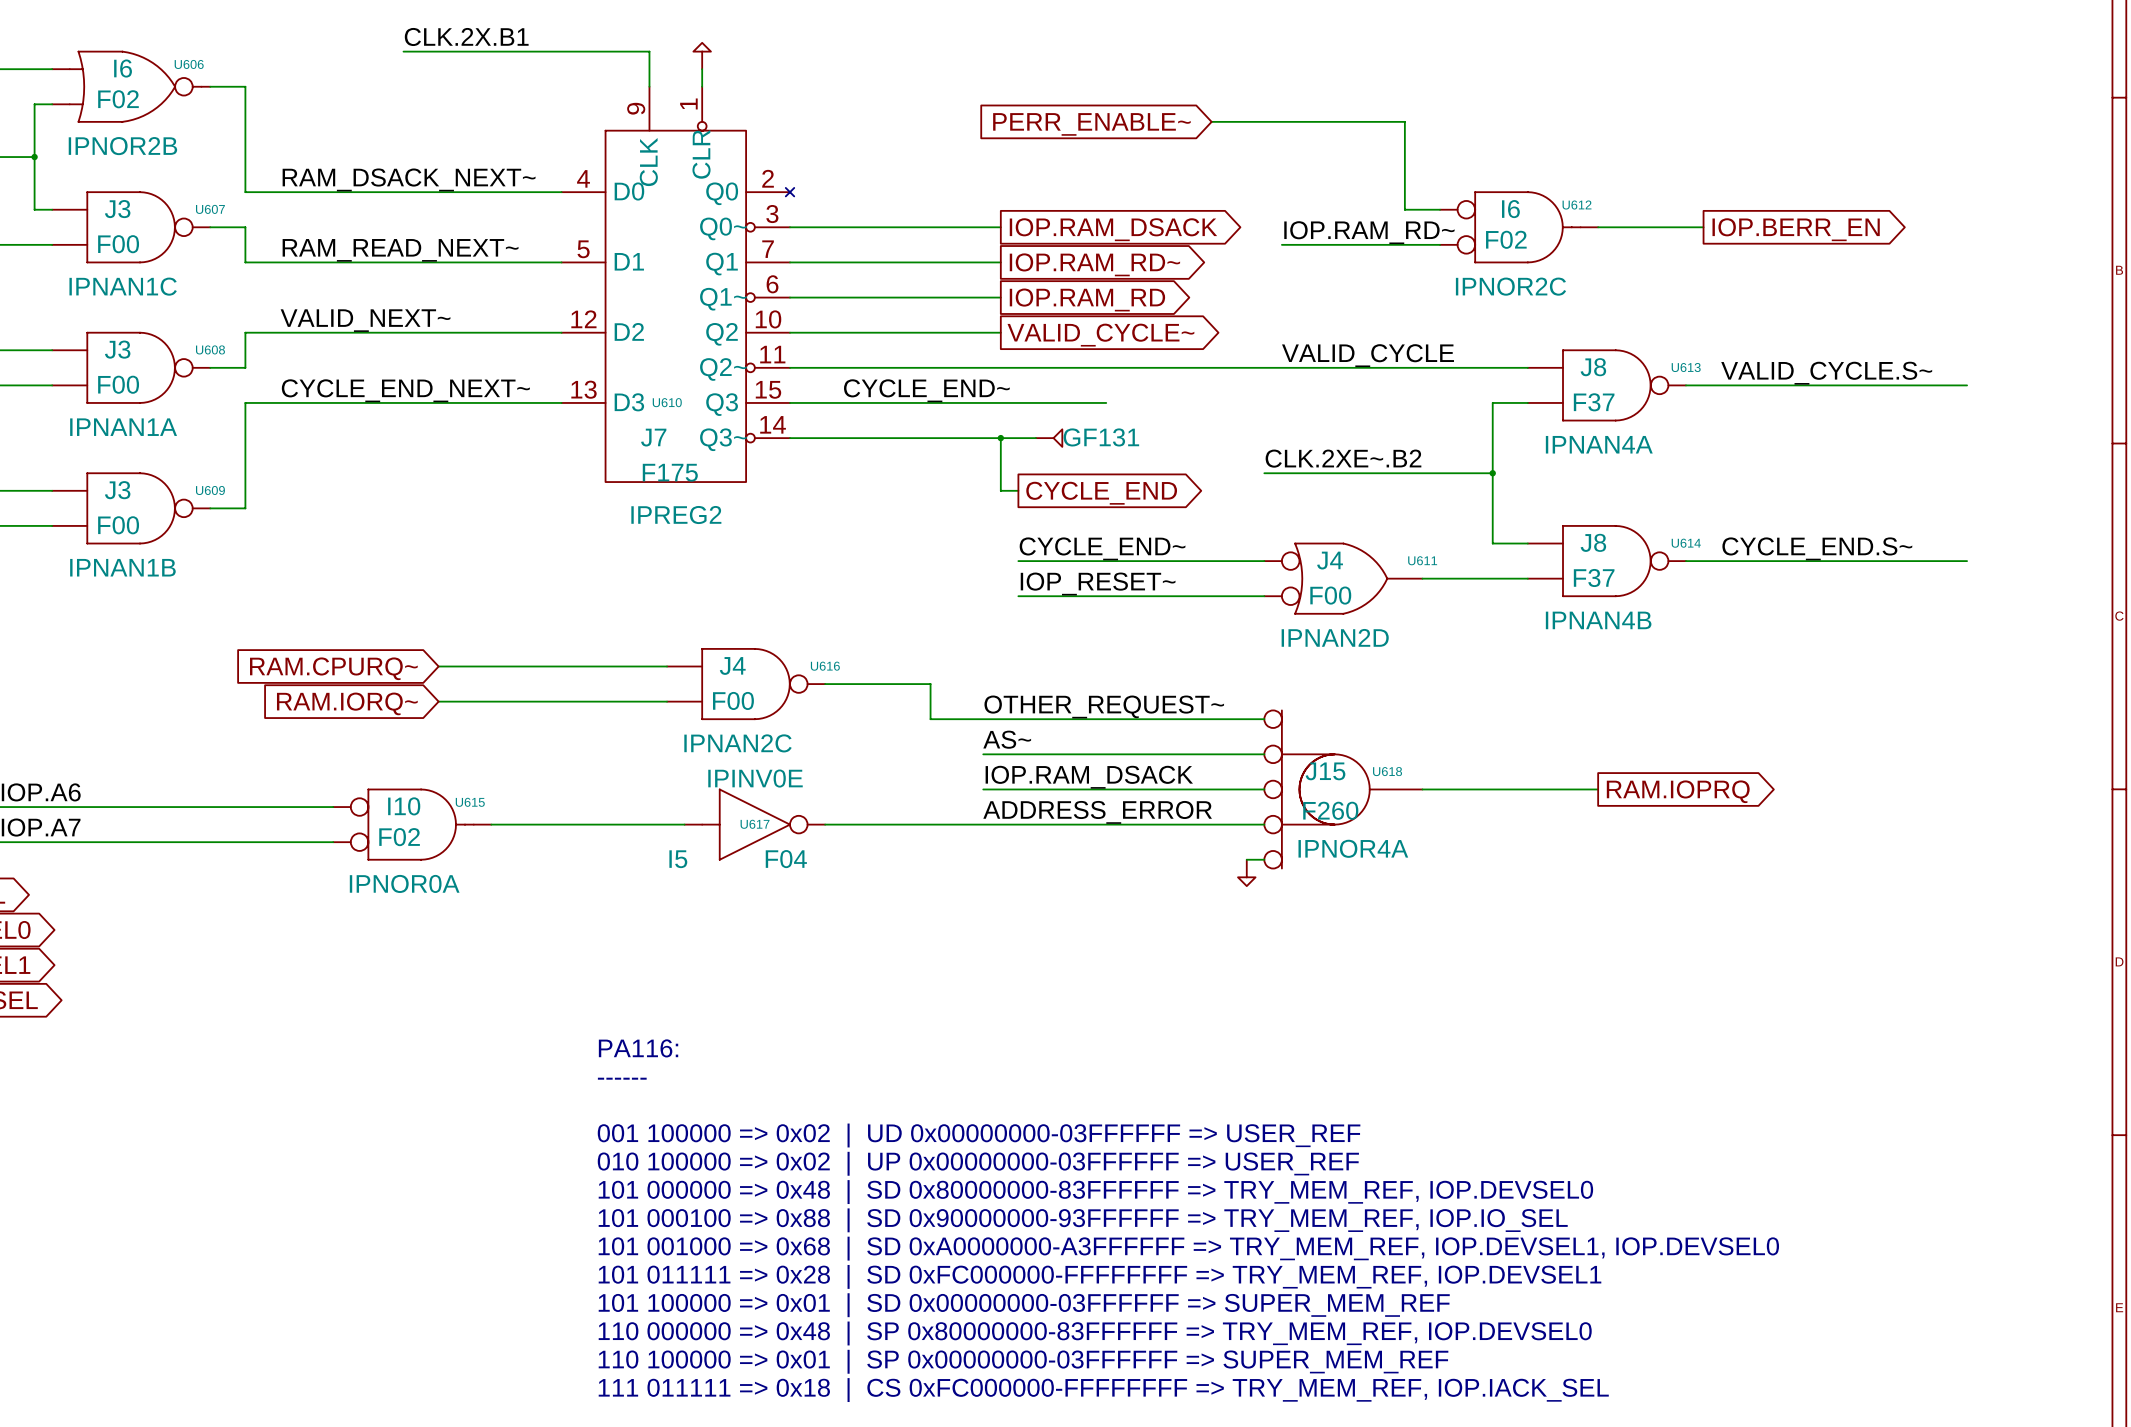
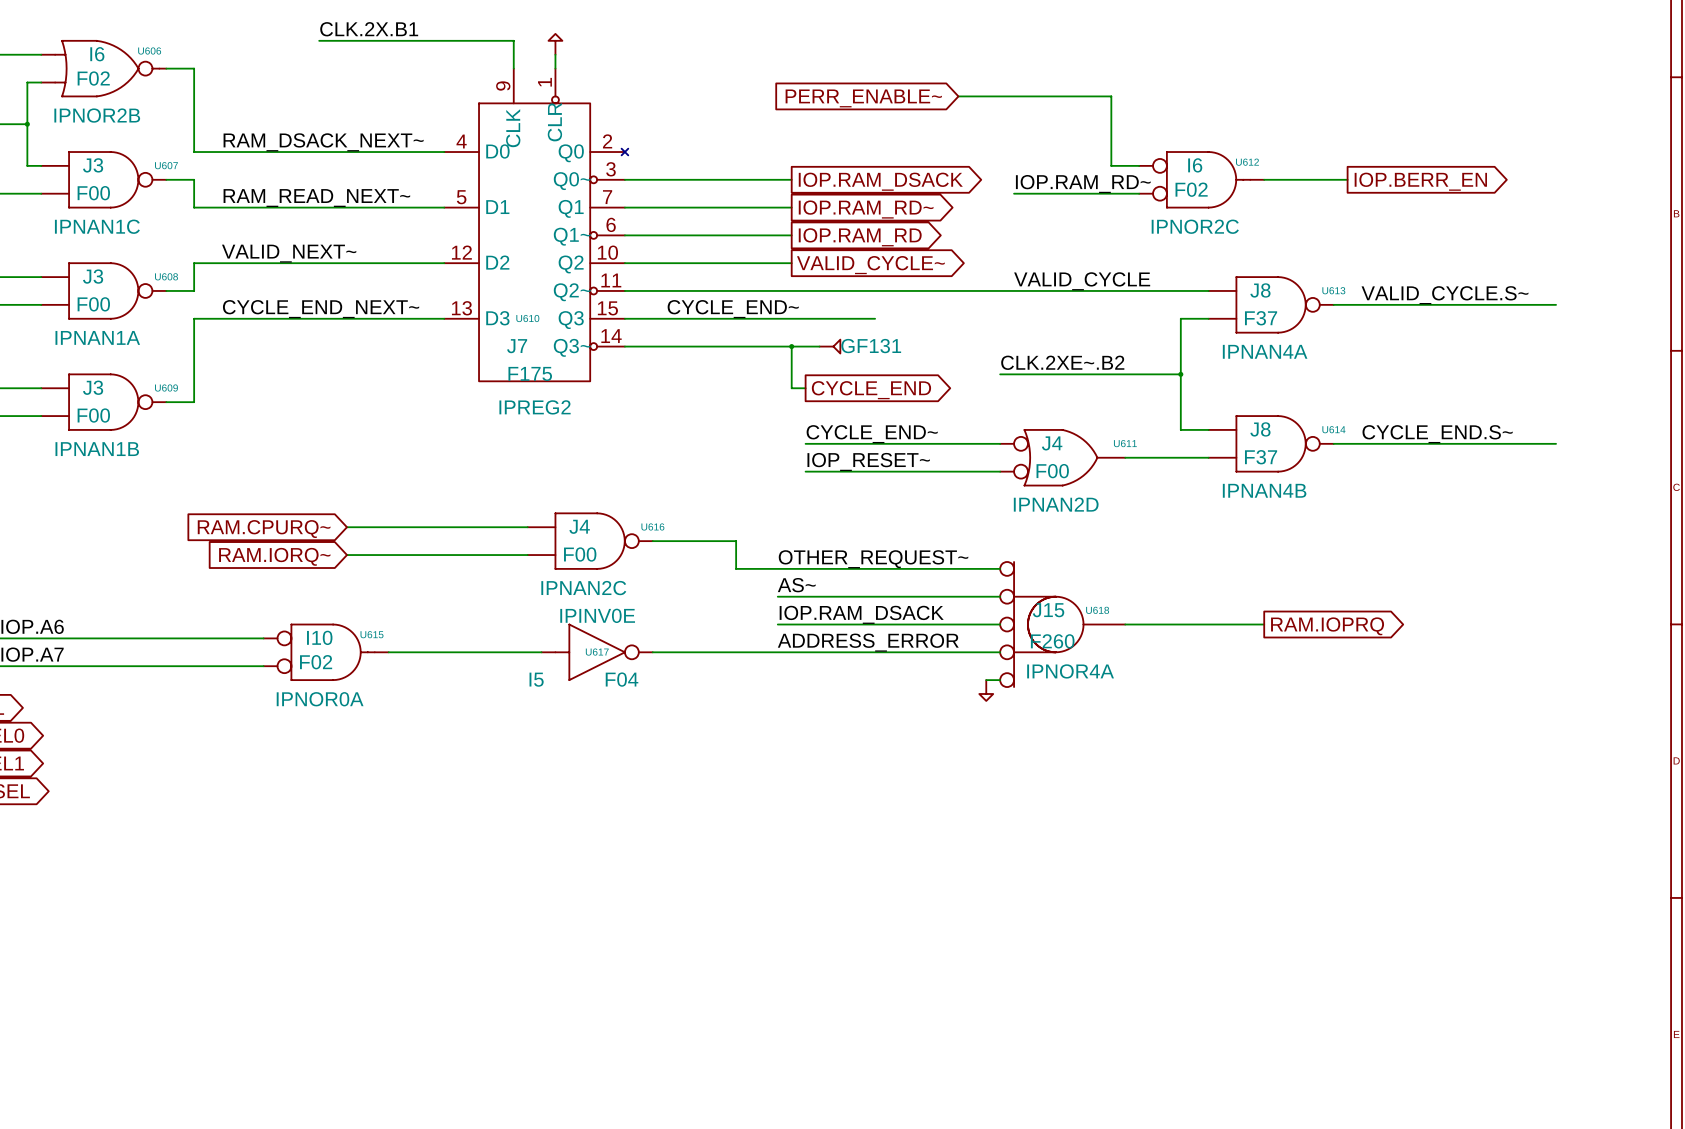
text: PA116: (638, 1048) -> none
text: ------ (622, 1078) -> none
text: 001 100000 => 0x02 | UD 0x00000000-03FFFFFF => USER_REF (979, 1135) -> none
text: 010 100000 => 0x02 | UP 0x00000000-03FFFFFF => USER_REF (978, 1163) -> none
text: 101 000000 => 0x48 | SD 0x80000000-83FFFFFF => TRY_MEM_REF, IOP.DEVSEL0 (1095, 1192) -> none
text: 101 000100 => 0x88 | SD 0x90000000-93FFFFFF => TRY_MEM_REF, IOP.IO_SEL (1083, 1220) -> none
text: 101 001000 => 0x68 | SD 0xA0000000-A3FFFFFF => TRY_MEM_REF, IOP.DEVSEL1, IOP.DEVSEL0 (1188, 1248) -> none
text: 101 011111 => 0x28 | SD 0xFC000000-FFFFFFFF => TRY_MEM_REF, IOP.DEVSEL1 (1100, 1276) -> none
text: 101 100000 => 0x01 | SD 0x00000000-03FFFFFF => SUPER_MEM_REF (1024, 1305) -> none
text: 110 000000 => 0x48 | SP 0x80000000-83FFFFFF => TRY_MEM_REF, IOP.DEVSEL0 (1095, 1333) -> none
text: 110 100000 => 0x01 | SP 0x00000000-03FFFFFF => SUPER_MEM_REF (1023, 1361) -> none
text: 111 011111 => 0x18 | CS 0xFC000000-FFFFFFFF => TRY_MEM_REF, IOP.IACK_SEL (1103, 1390) -> none

